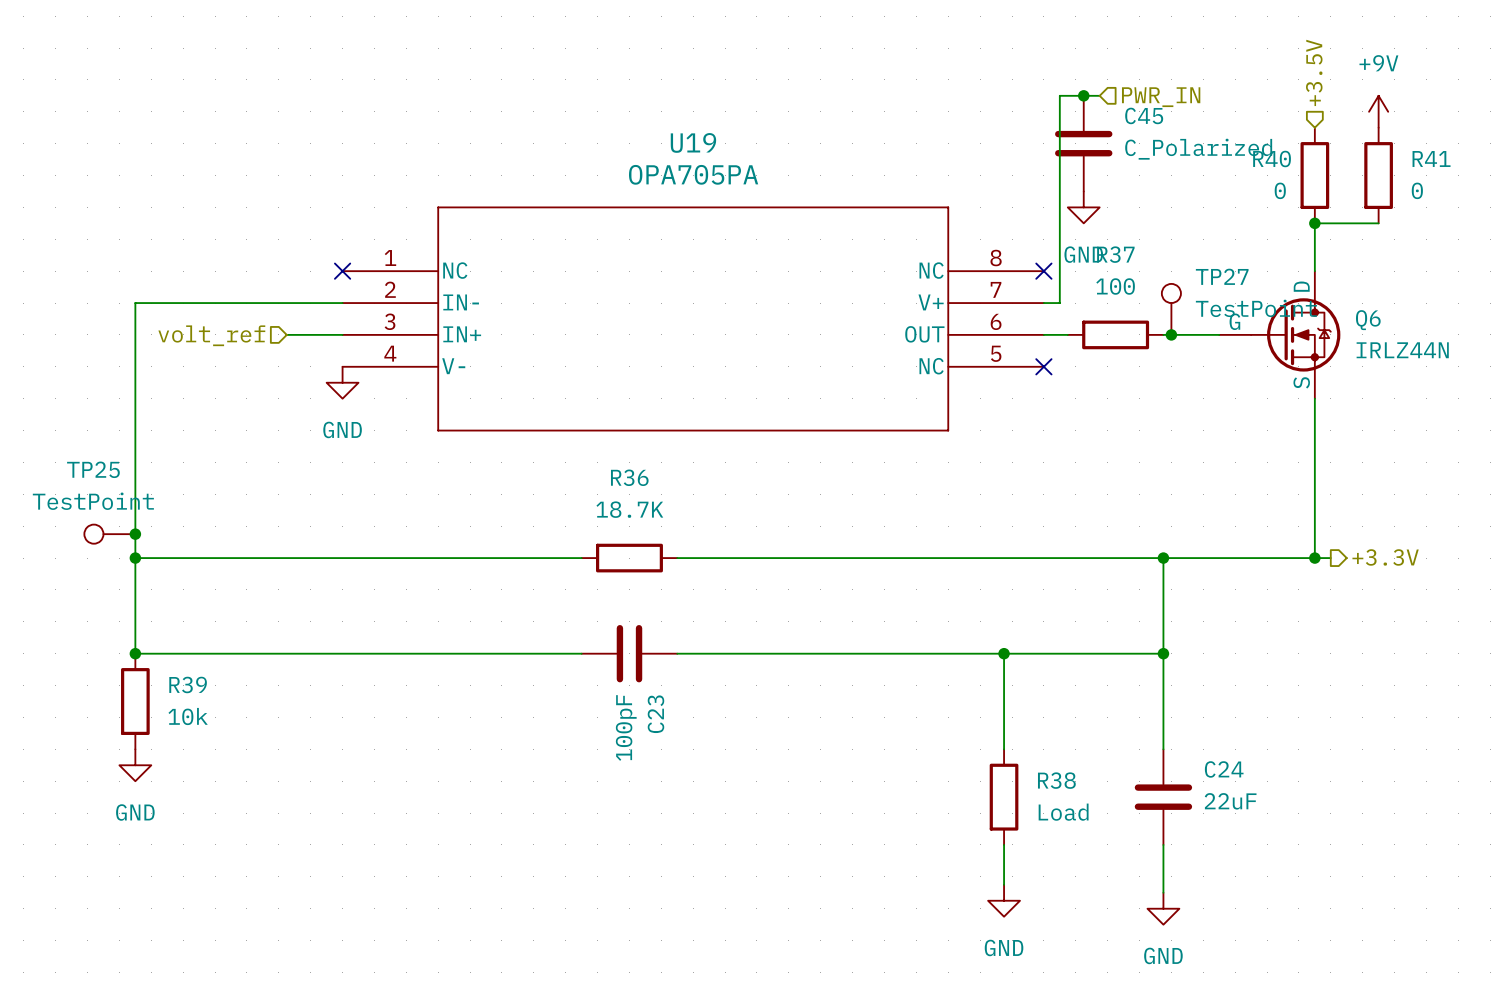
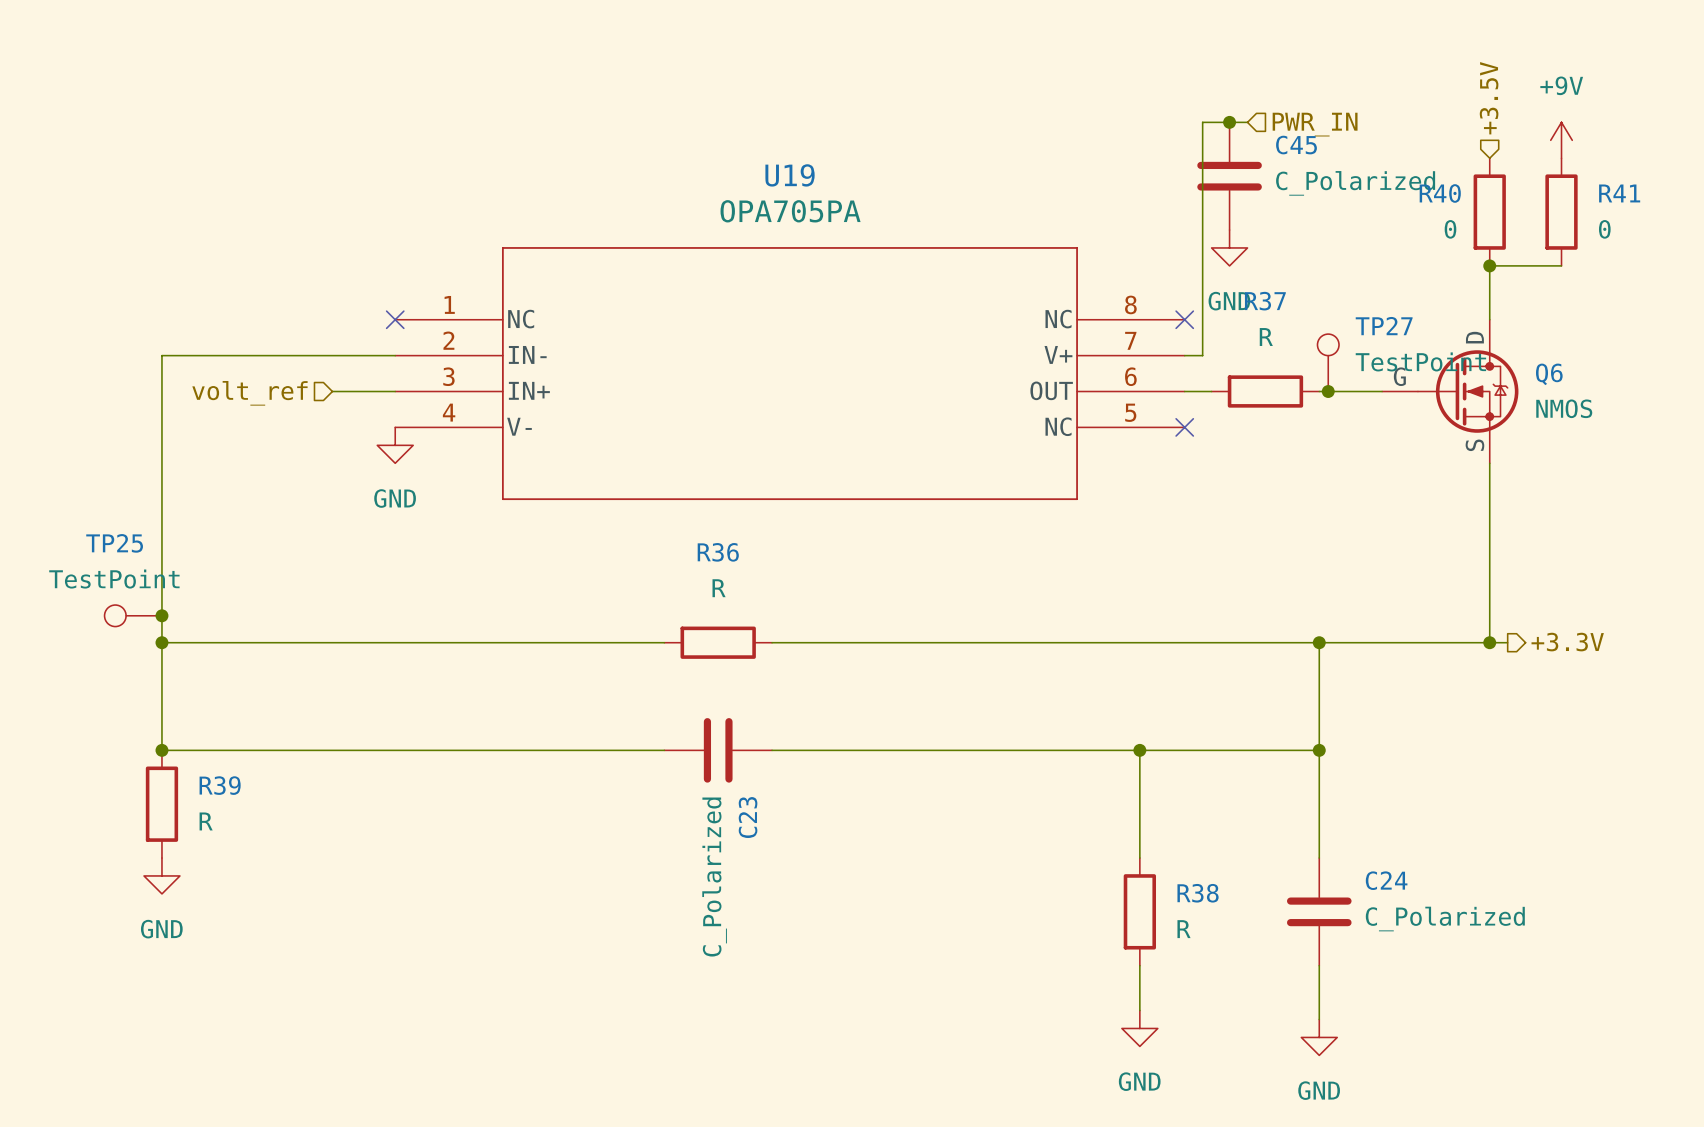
R37 value: 100 (1115, 286) -> R (1266, 337)
Q6 value: IRLZ44N (1402, 350) -> NMOS (1564, 408)
R36 value: 18.7K (629, 509) -> R (719, 588)
R39 value: 10k (188, 716) -> R (206, 821)
C23 value: 100pF (626, 727) -> C_Polarized (714, 877)
C24 value: 22uF (1230, 801) -> C_Polarized (1445, 919)
R38 value: Load (1063, 812) -> R (1184, 929)

